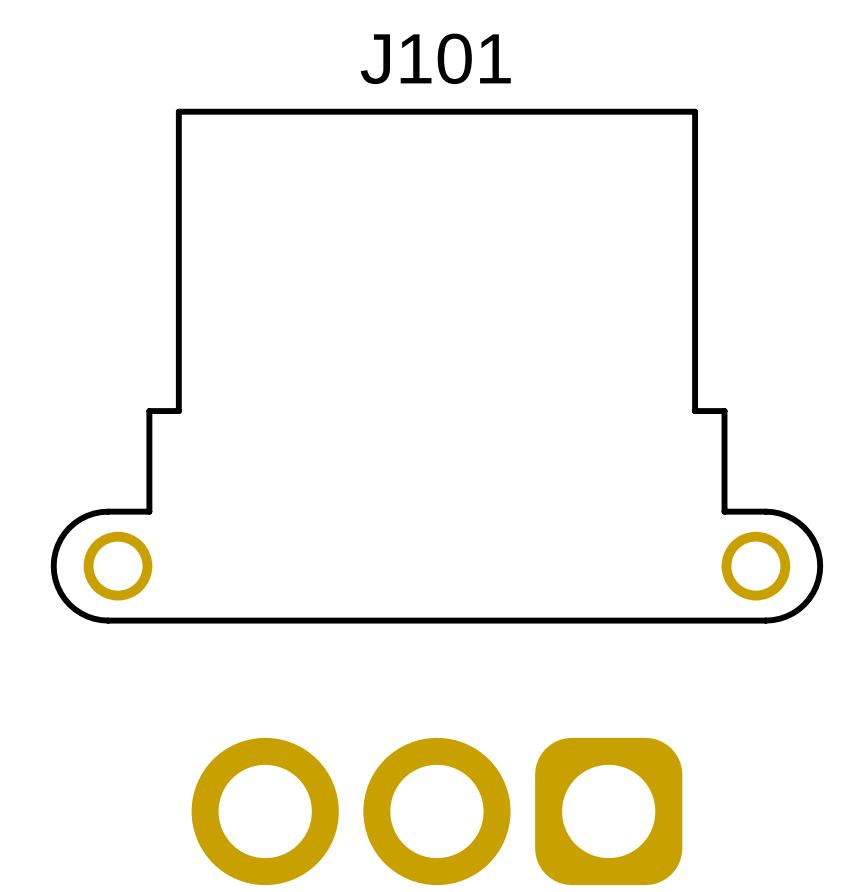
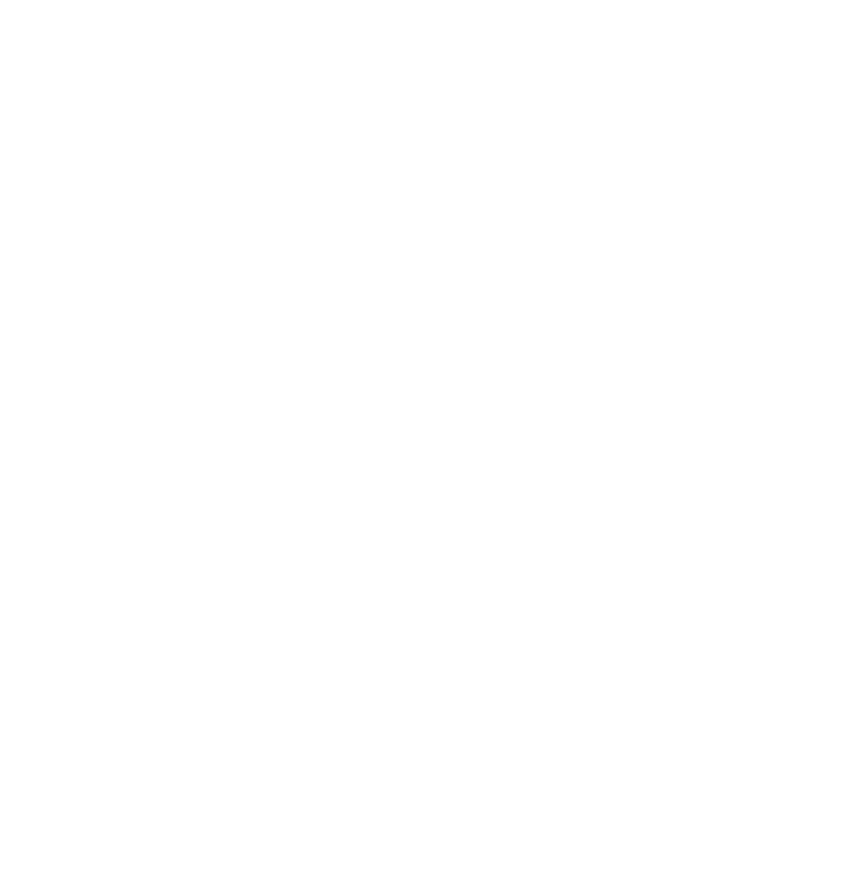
J101: (436, 496) -> none

